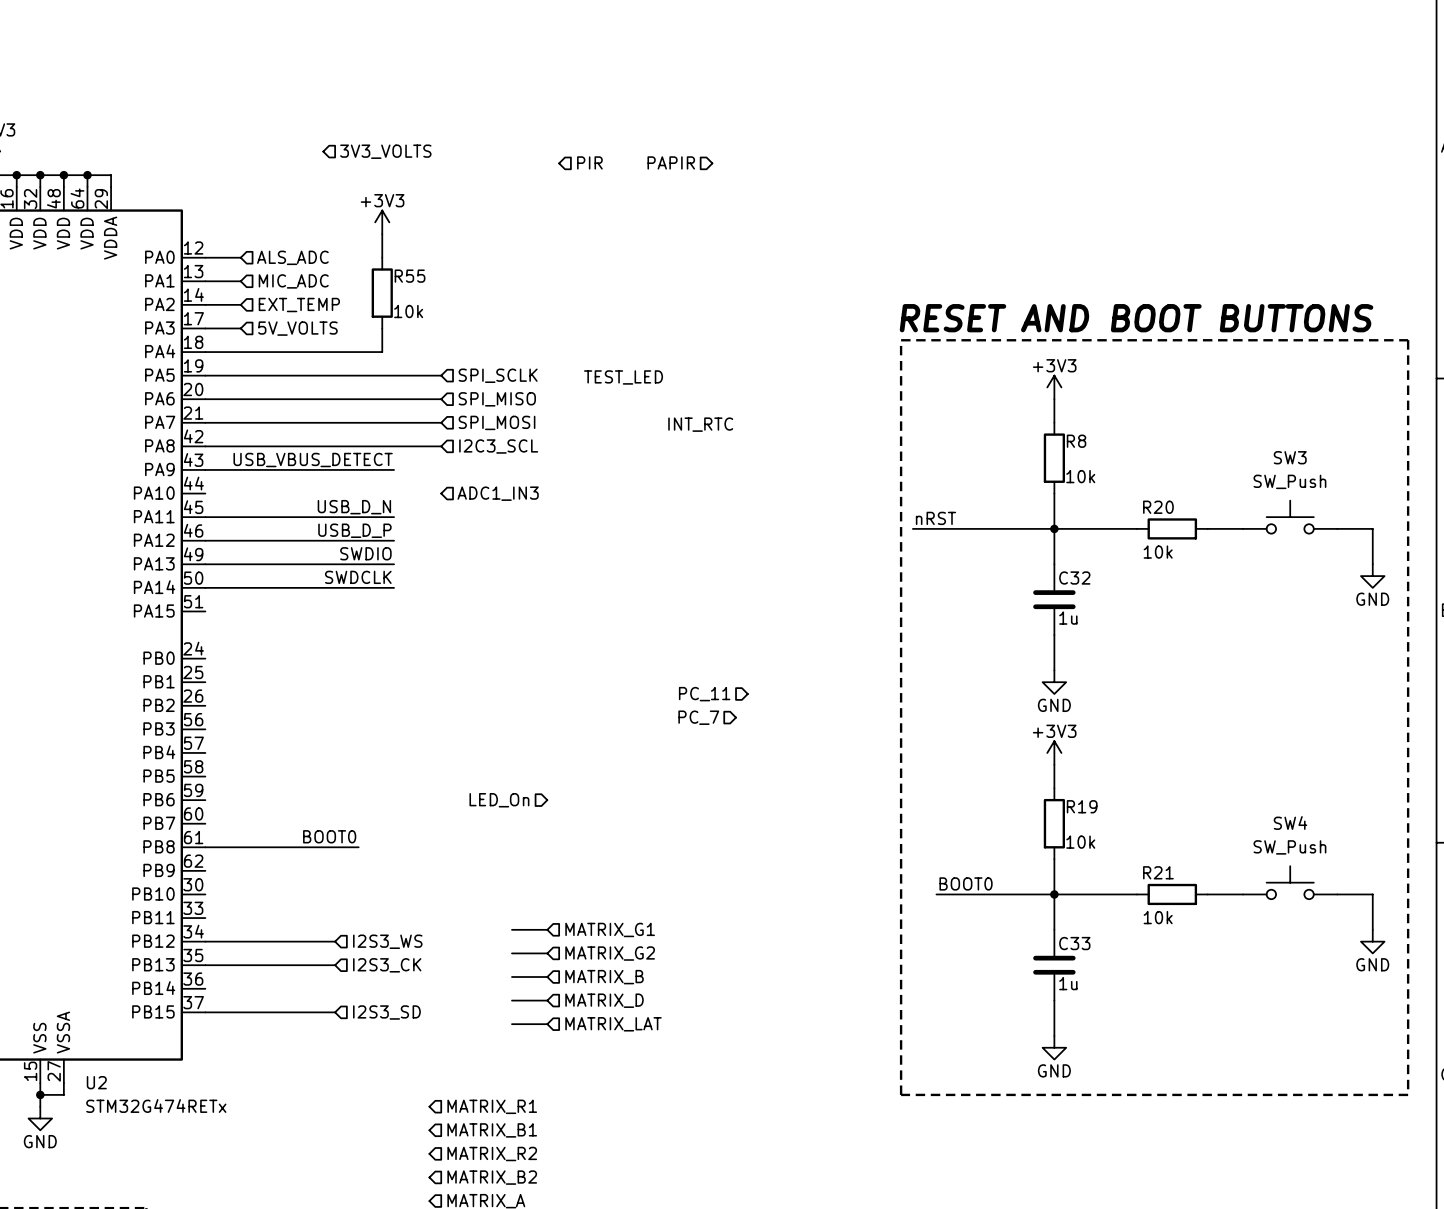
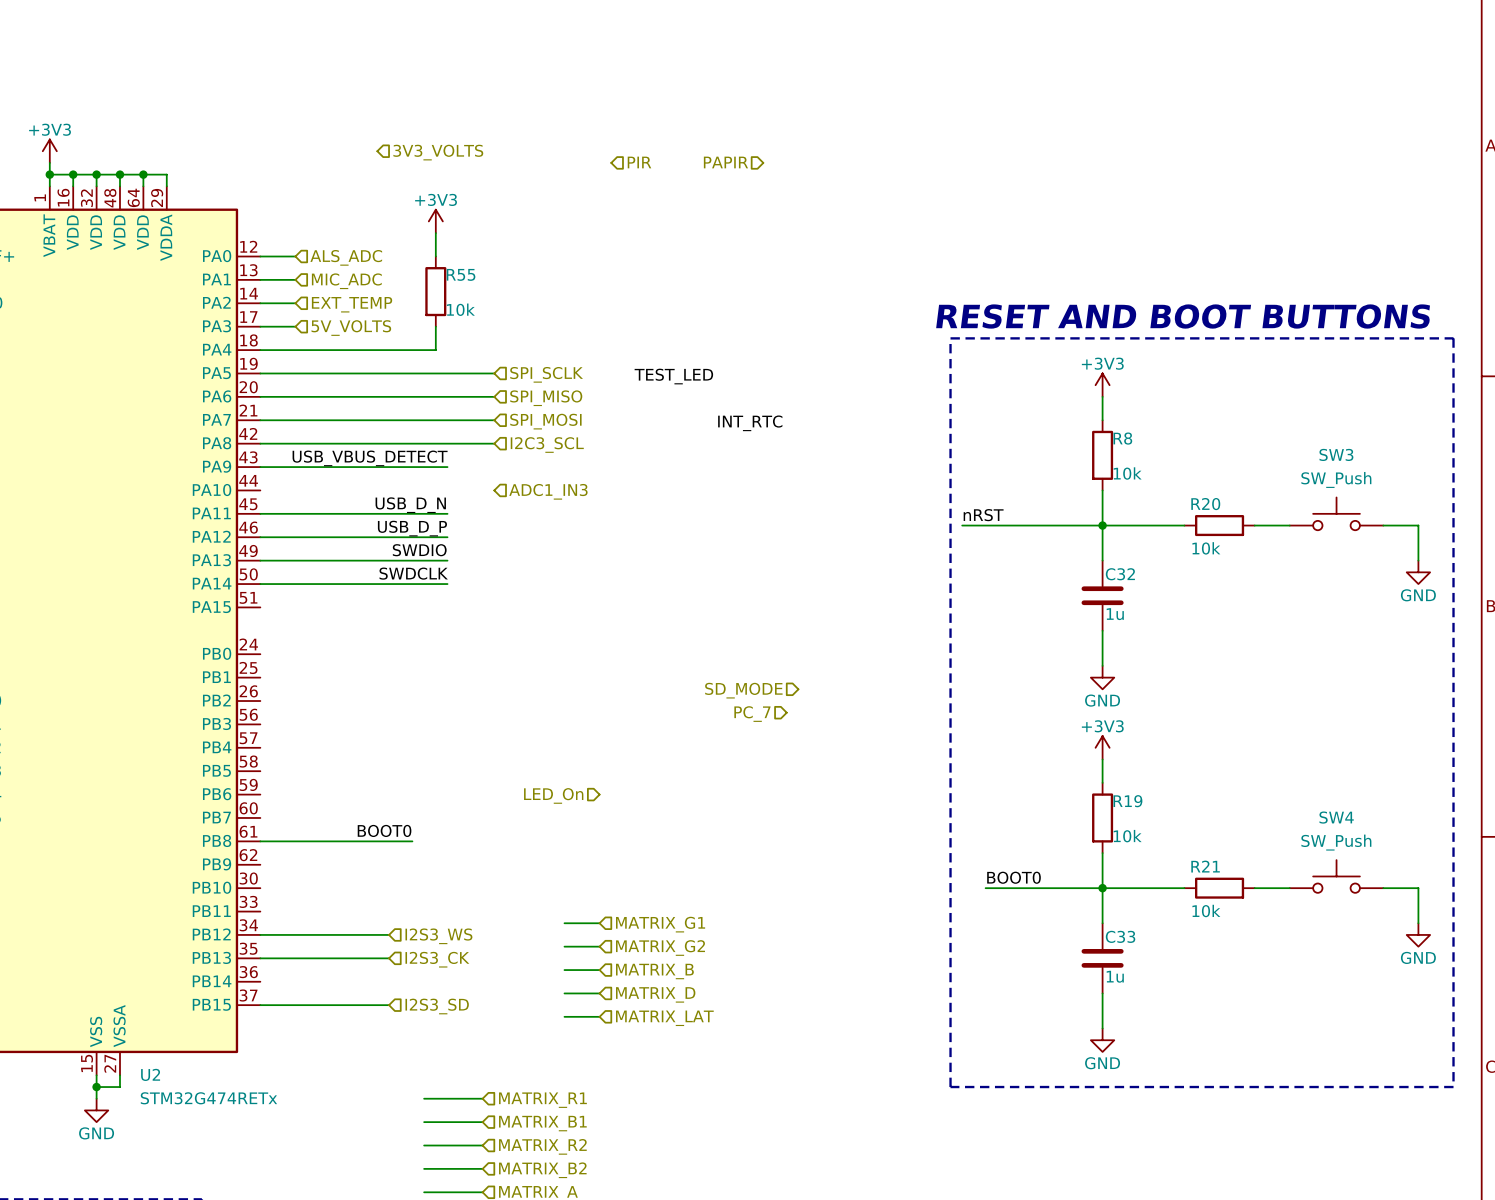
hierarchical label: PC_11 (704, 694) -> SD_MODE (743, 690)
wire: none -> (424, 1098) (482, 1098)
wire: none -> (424, 1122) (482, 1122)
wire: none -> (424, 1145) (482, 1145)
wire: none -> (424, 1168) (482, 1168)
wire: none -> (424, 1192) (482, 1192)

